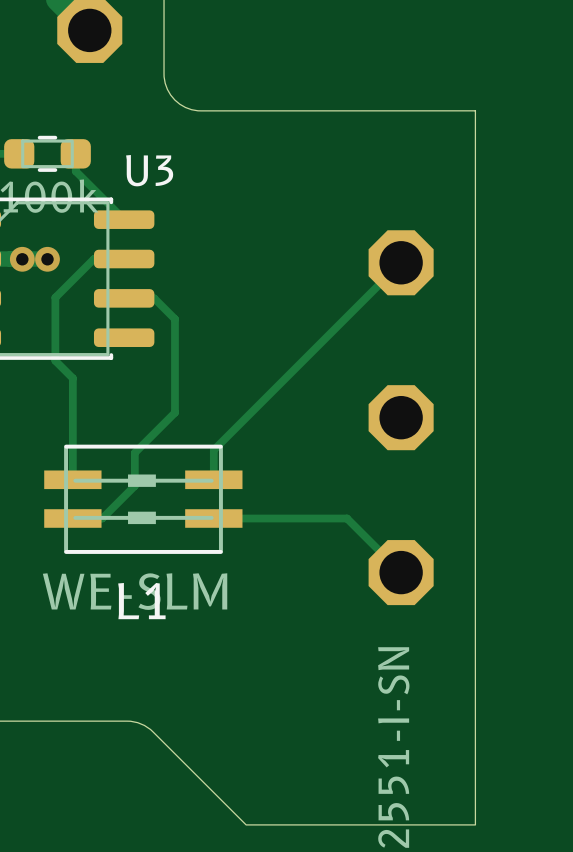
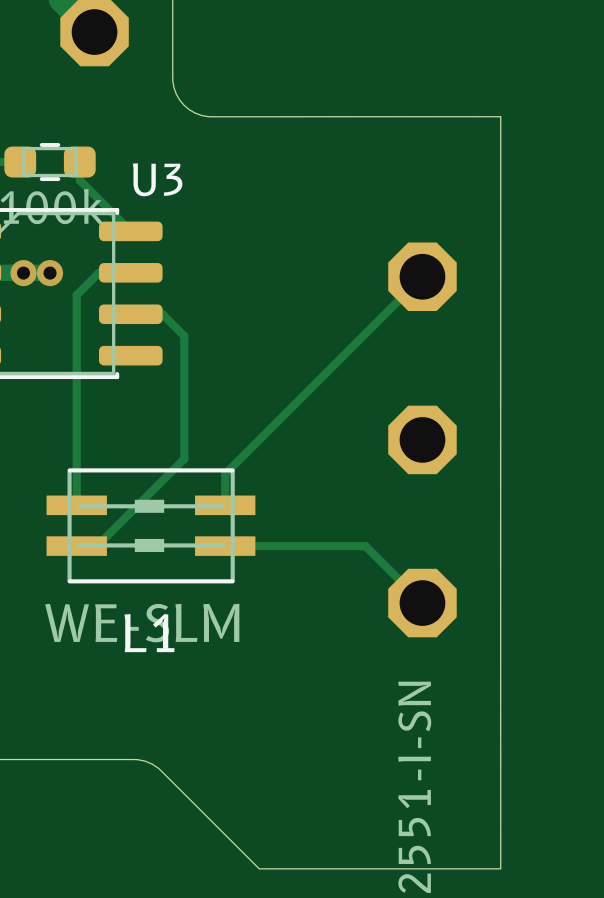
track: (72, 280) (55, 297) (55, 360) (72, 378) -> (76, 295) (76, 398)
track: (174, 412) (134, 452) (134, 485) (102, 518) (92, 518) -> (184, 434) (184, 458) (97, 546)

